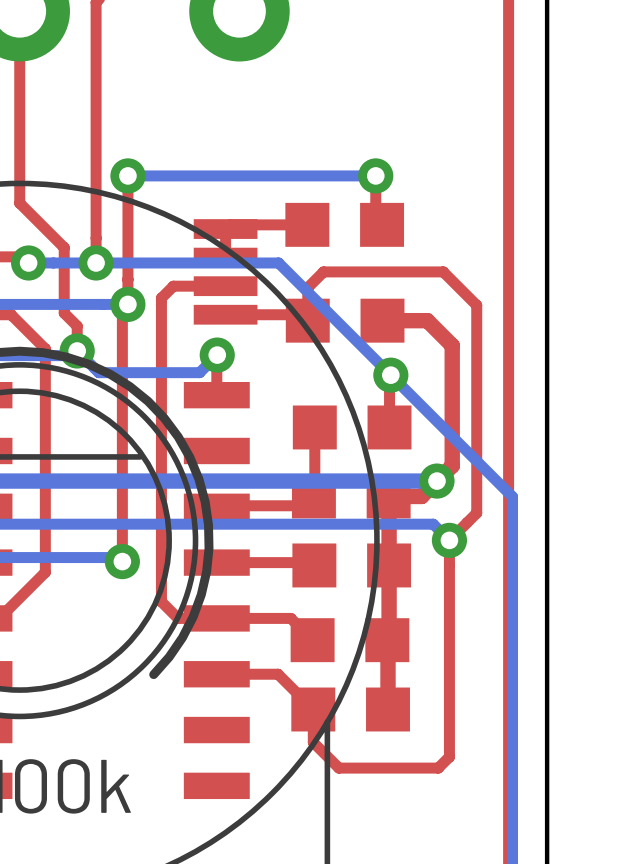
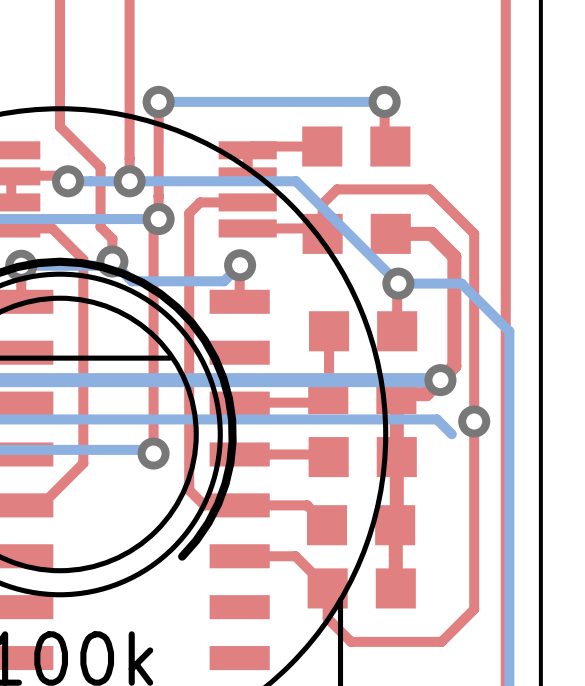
top track: (425, 271) (443, 271) (476, 305) (476, 513) (449, 540) (449, 756) -> (429, 189) (474, 233) (474, 609) (451, 631)
bottom track: (390, 375) (512, 496) -> (398, 283) (461, 283) (509, 331) (509, 394)
via position: (449, 540) -> (474, 421)

